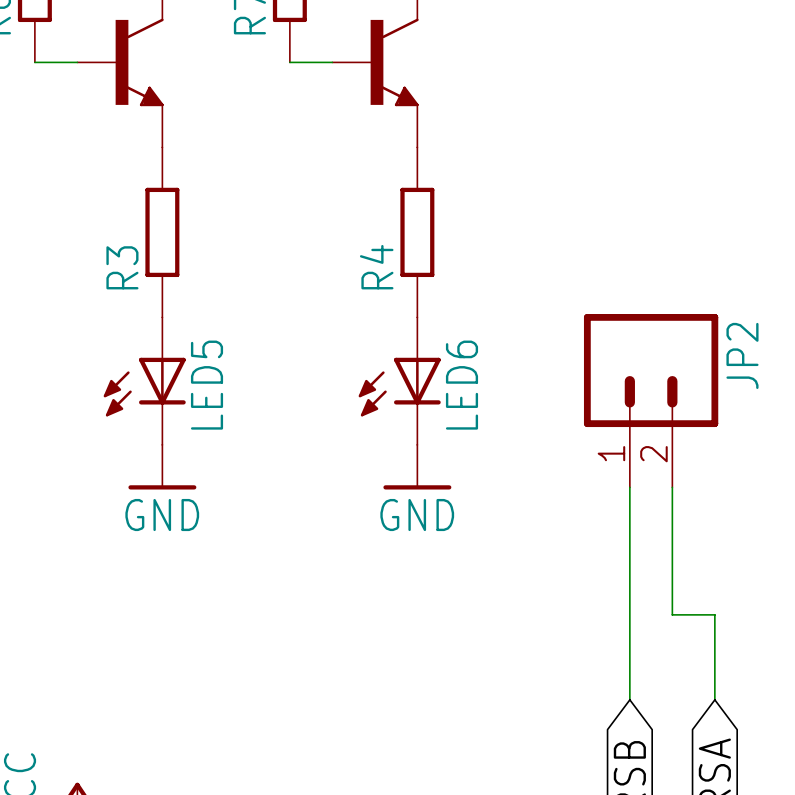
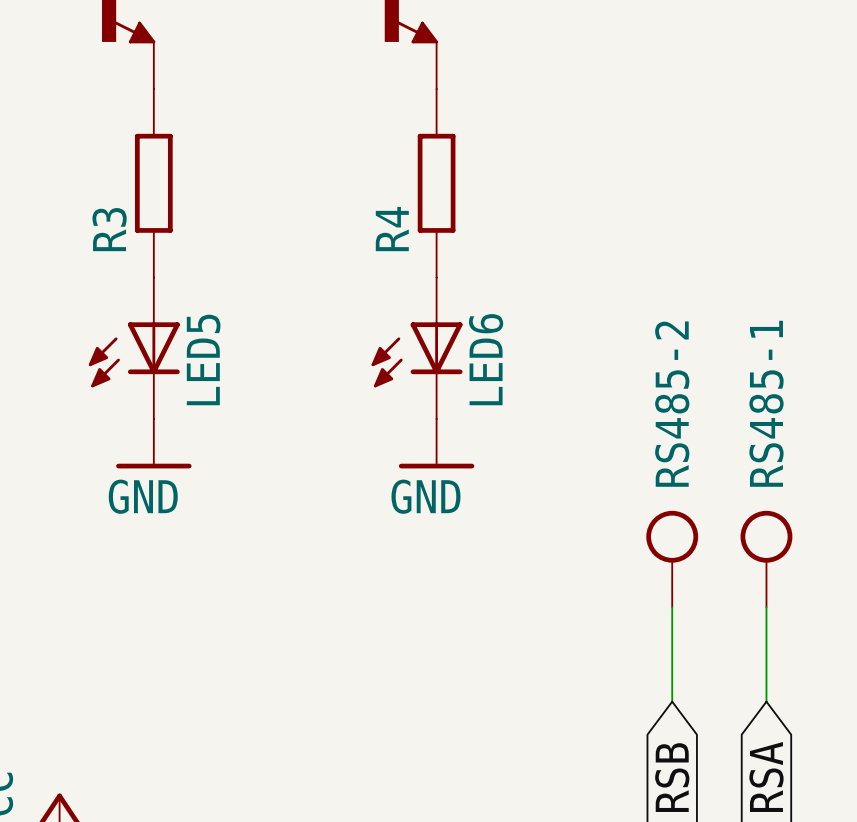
JP2: (651, 400) -> none
wire: (629, 487) (629, 614) -> none
wire: (672, 487) (672, 614) (714, 614) -> none
RS485-2: none -> (672, 559)
RS485-1: none -> (766, 559)

